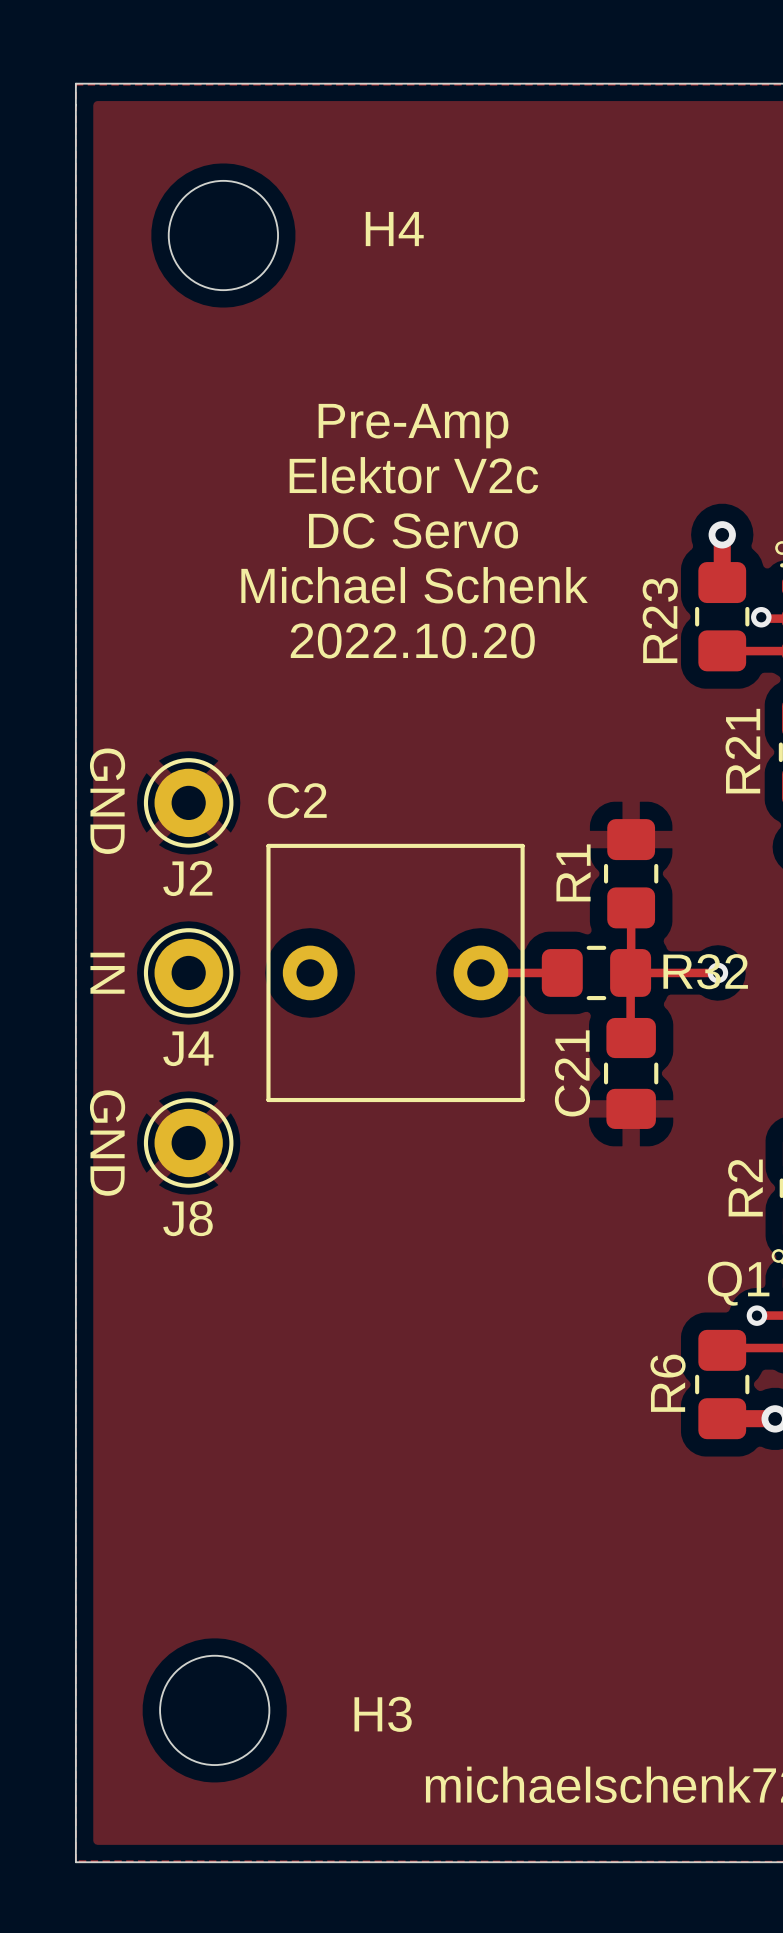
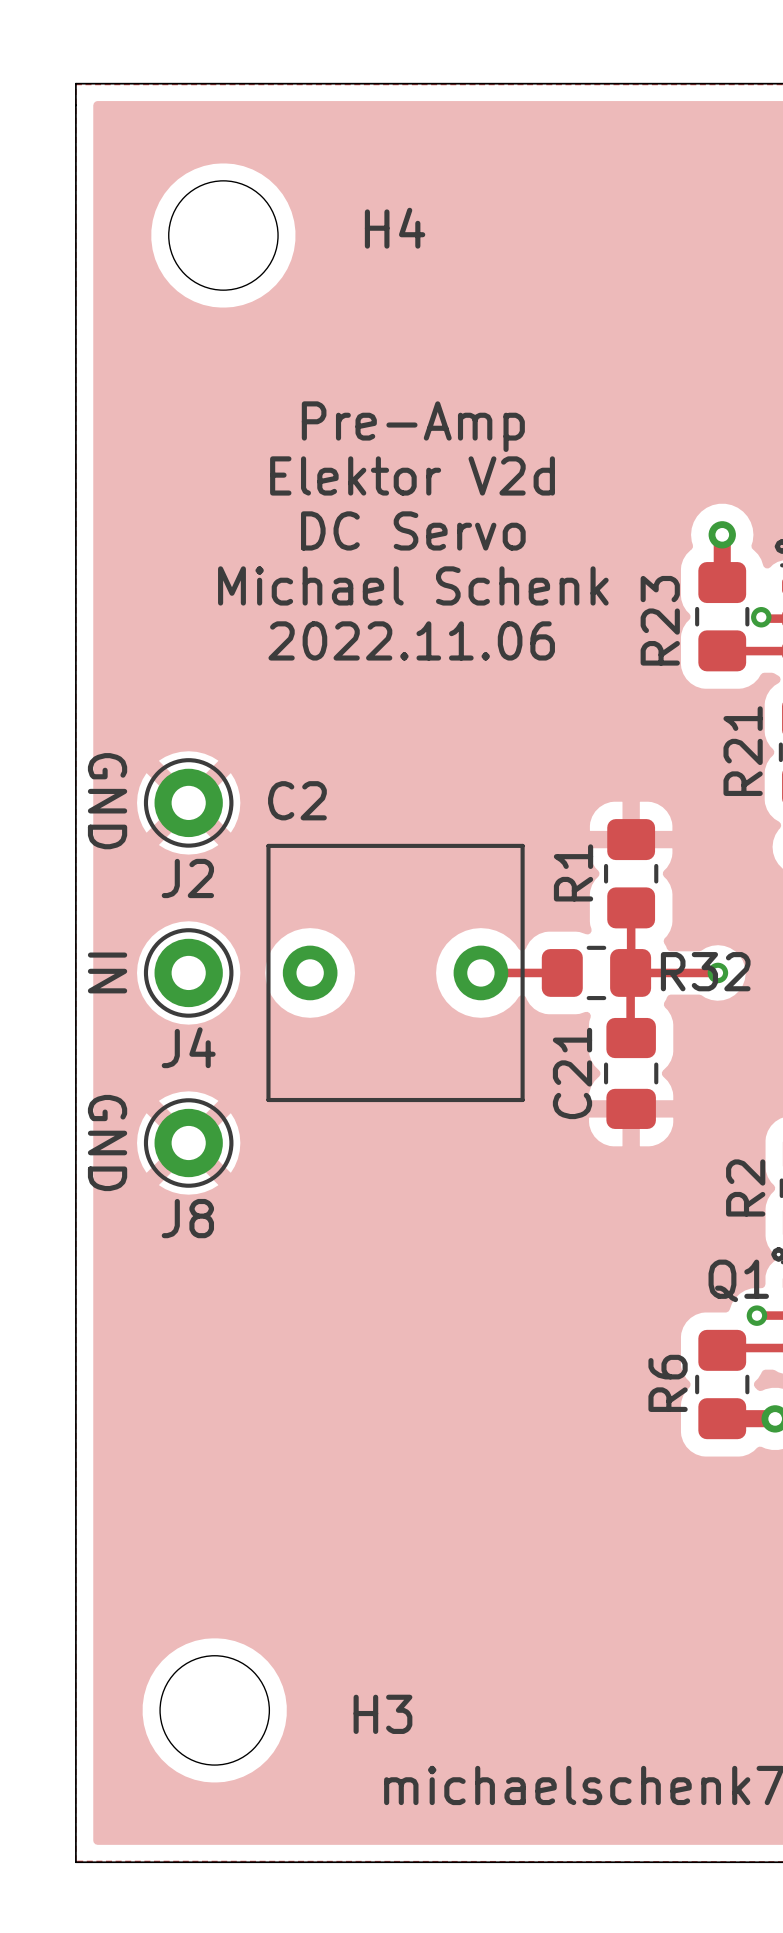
text: Elektor V2c (413, 475) -> Elektor V2d (412, 475)
text: 2022.10.20 (412, 640) -> 2022.11.06 (411, 640)

